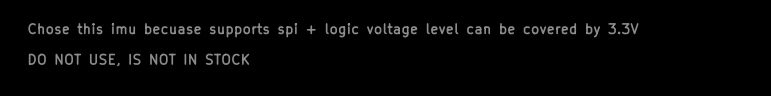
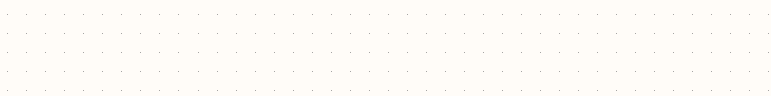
text: Chose this imu becuase supports spi + logic voltage level can be covered by 3.3V (333, 30) -> none
text: DO NOT USE, IS NOT IN STOCK (138, 59) -> none

